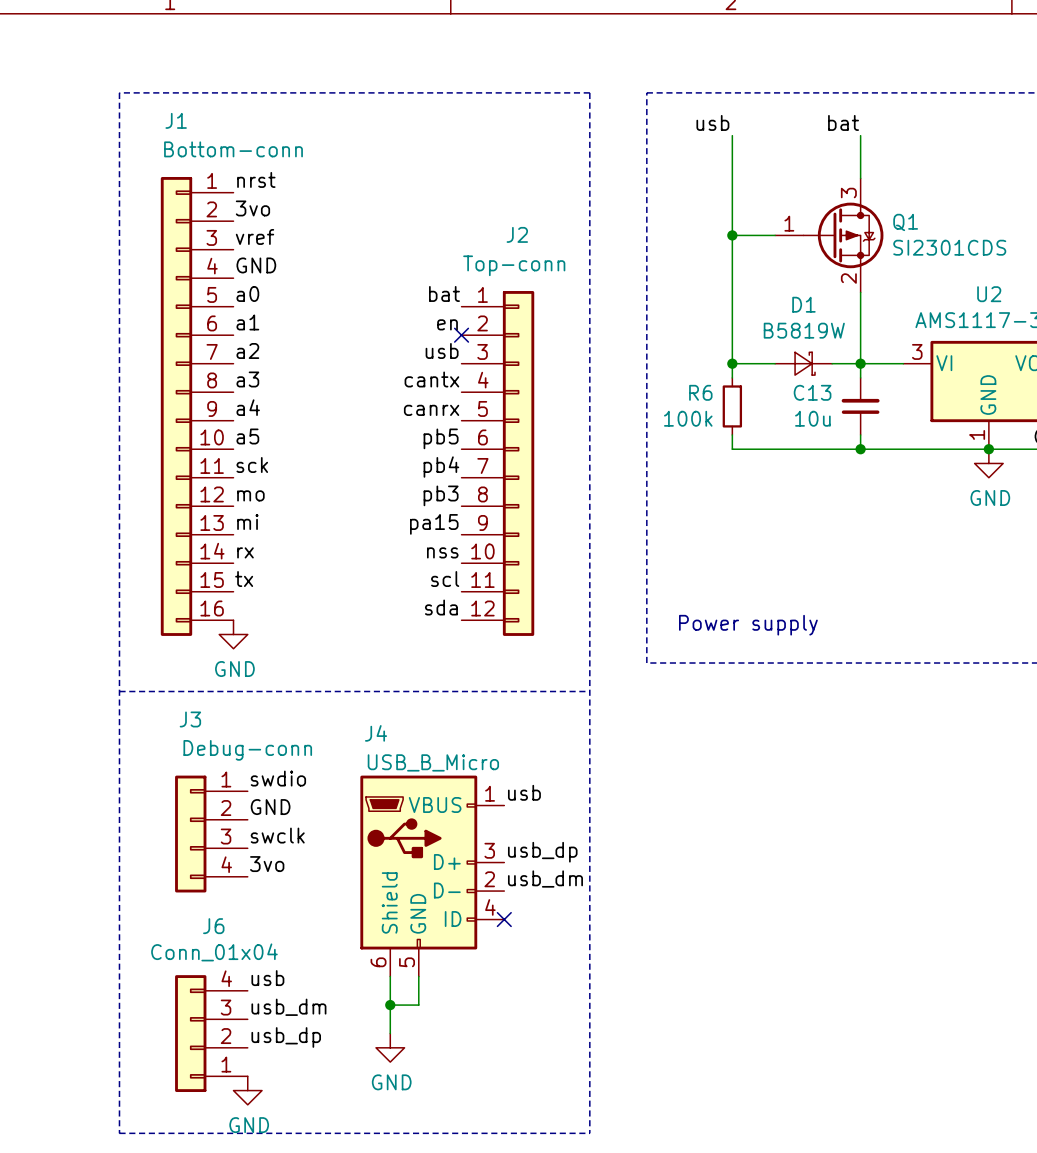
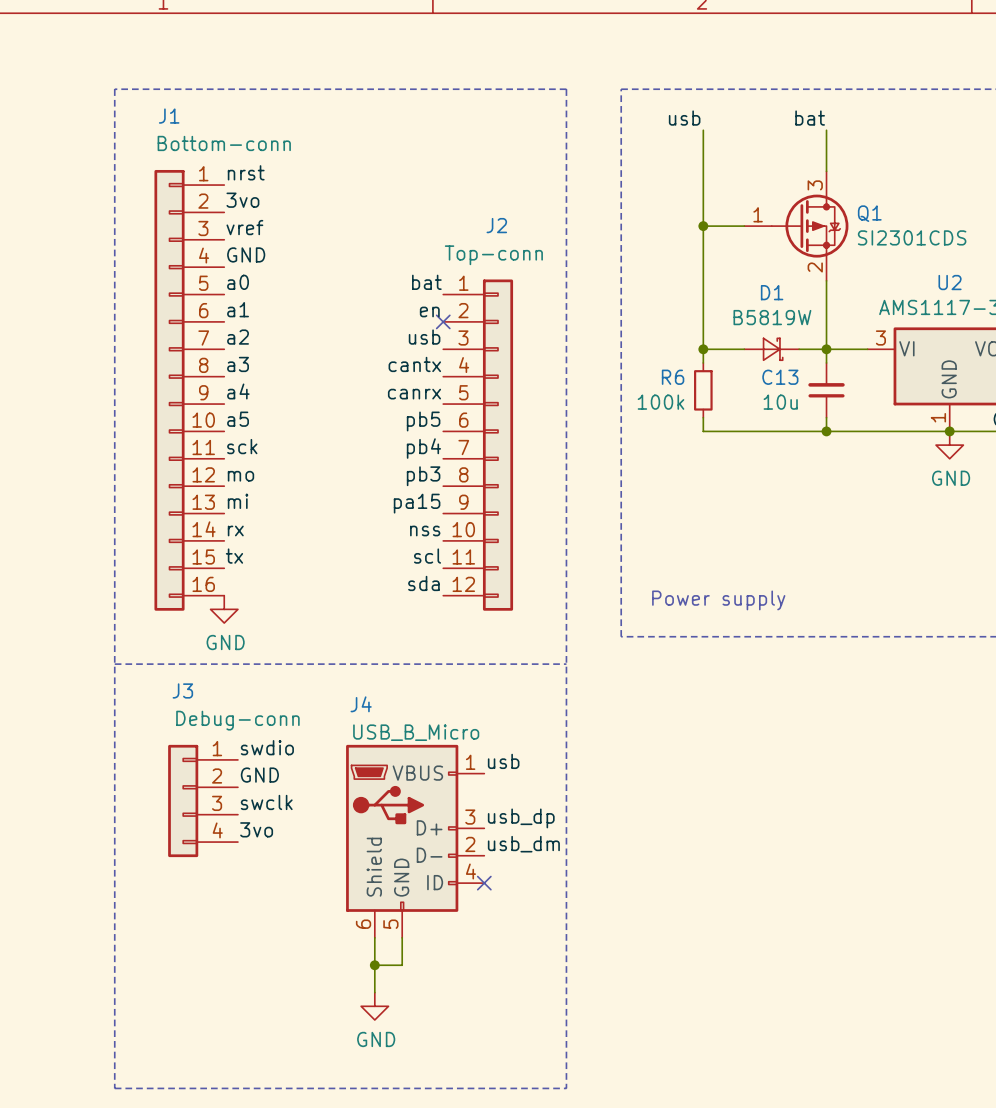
label: usb (267, 978) -> none
label: usb_dm (288, 1007) -> none
J6: Conn_01x04 (211, 1033) -> none
label: usb_dp (286, 1037) -> none
power symbol: GND (247, 1090) -> none

